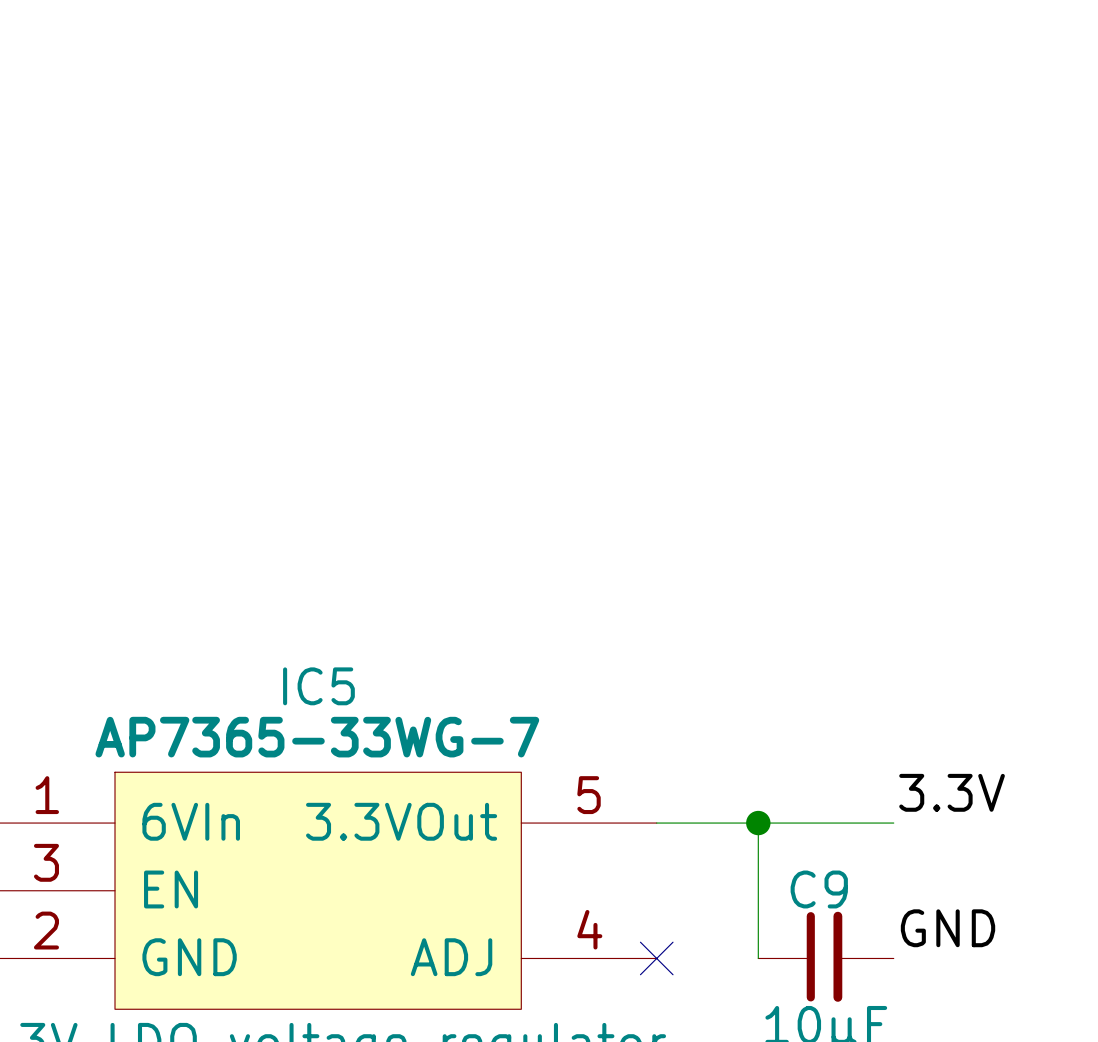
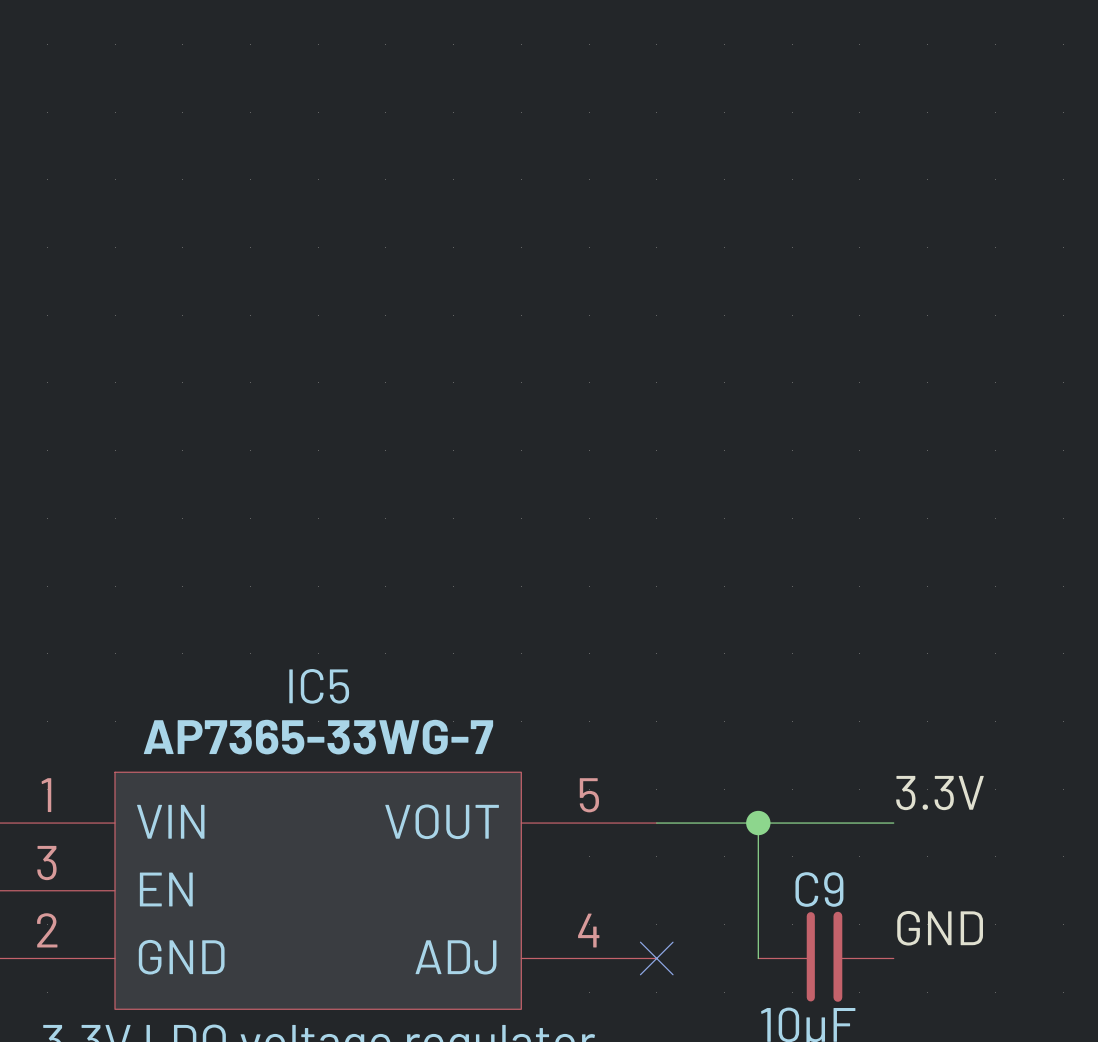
IC5 pin name: 6VIn (191, 821) -> VIN (170, 821)
IC5 pin name: 3.3VOut (401, 821) -> VOUT (442, 821)

